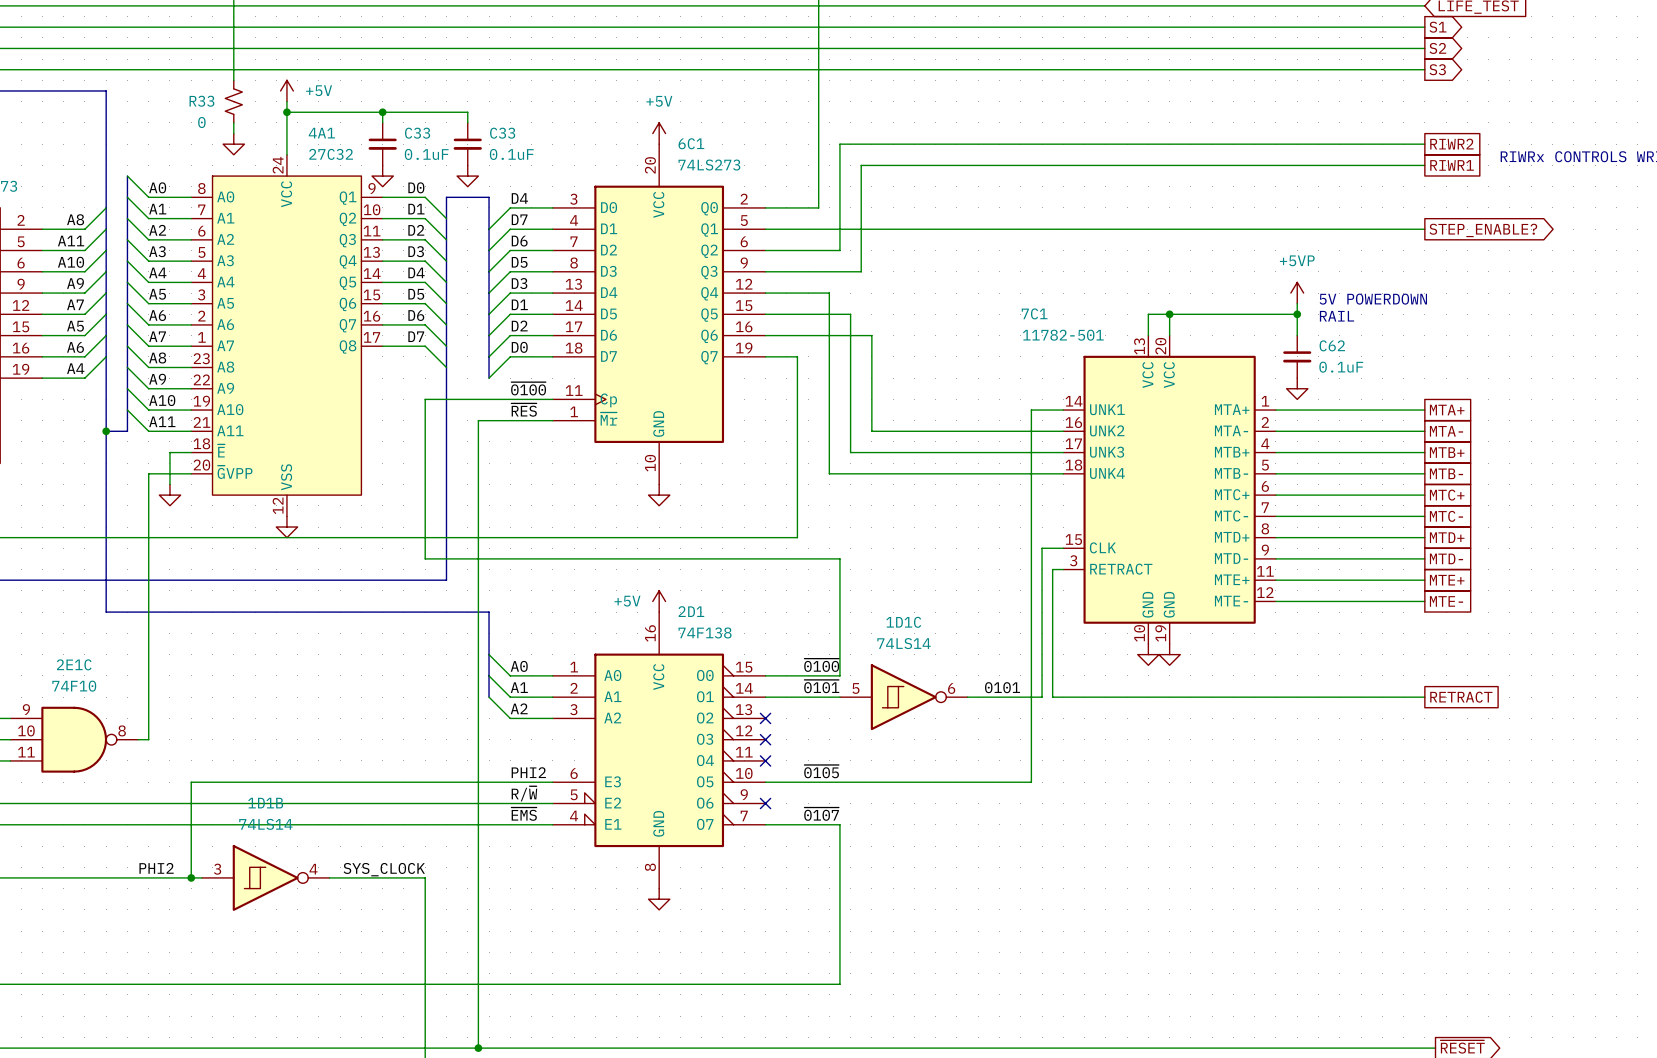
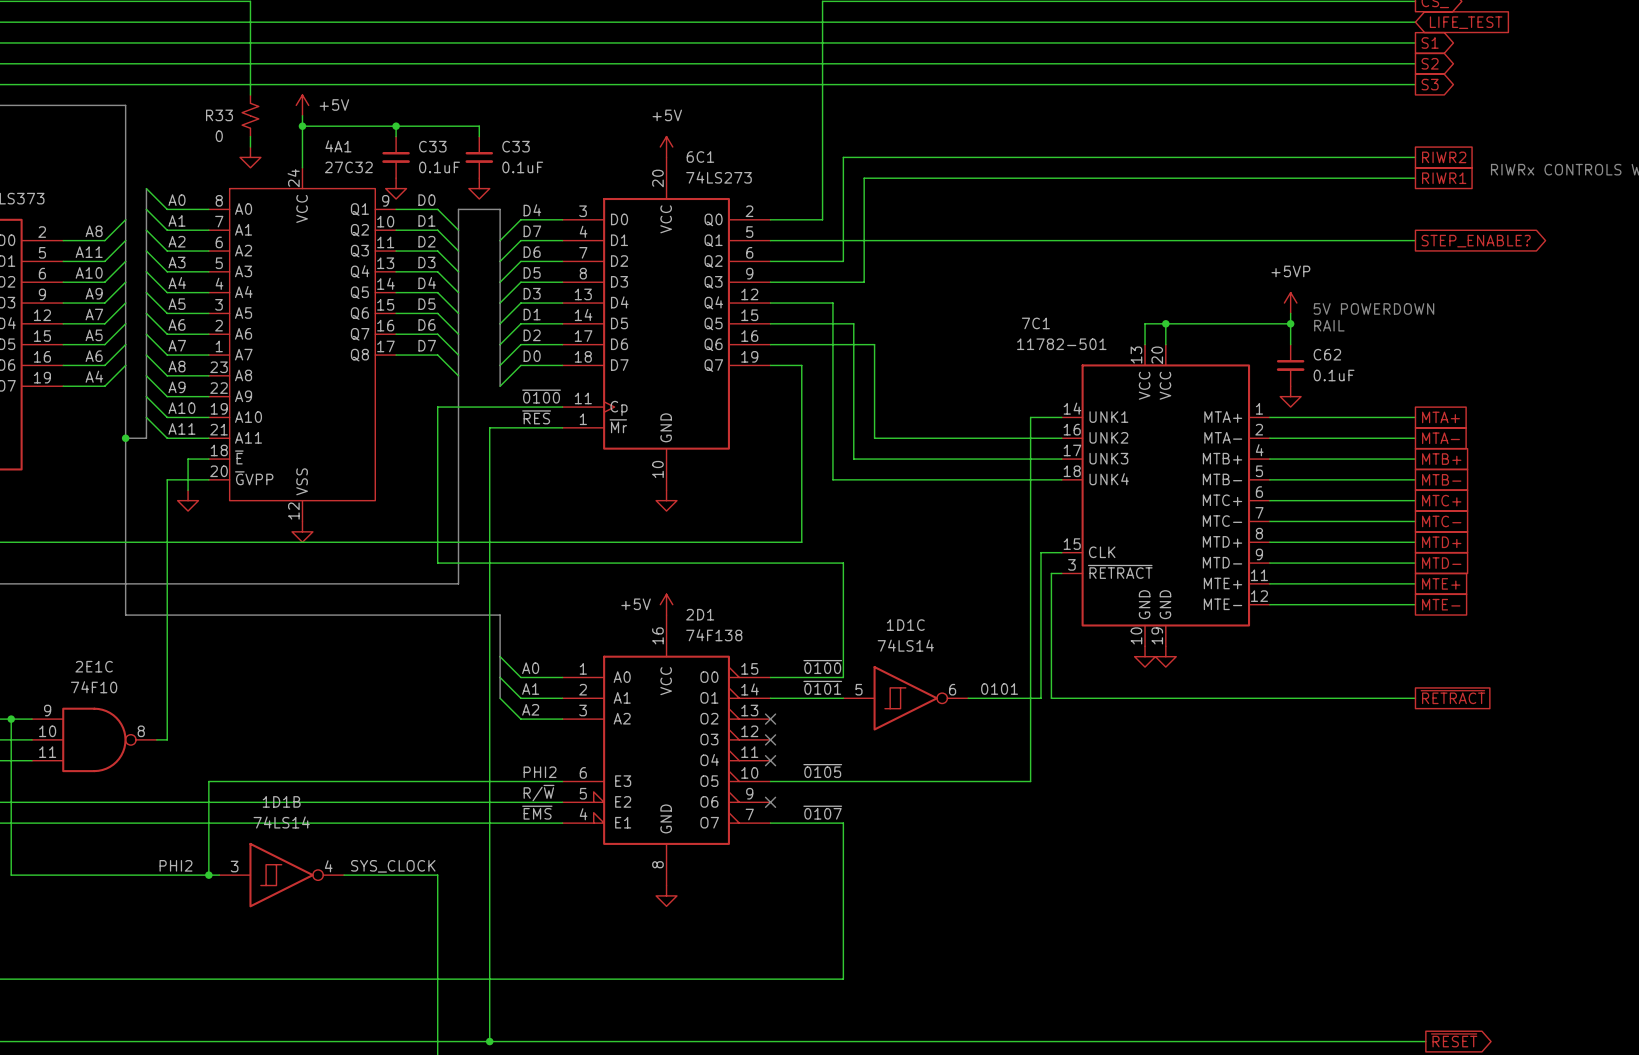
7C1 pin name: RETRACT (1121, 569) -> ~{RETRACT} (1120, 571)
global label: RETRACT (1461, 697) -> ~{RETRACT} (1452, 697)

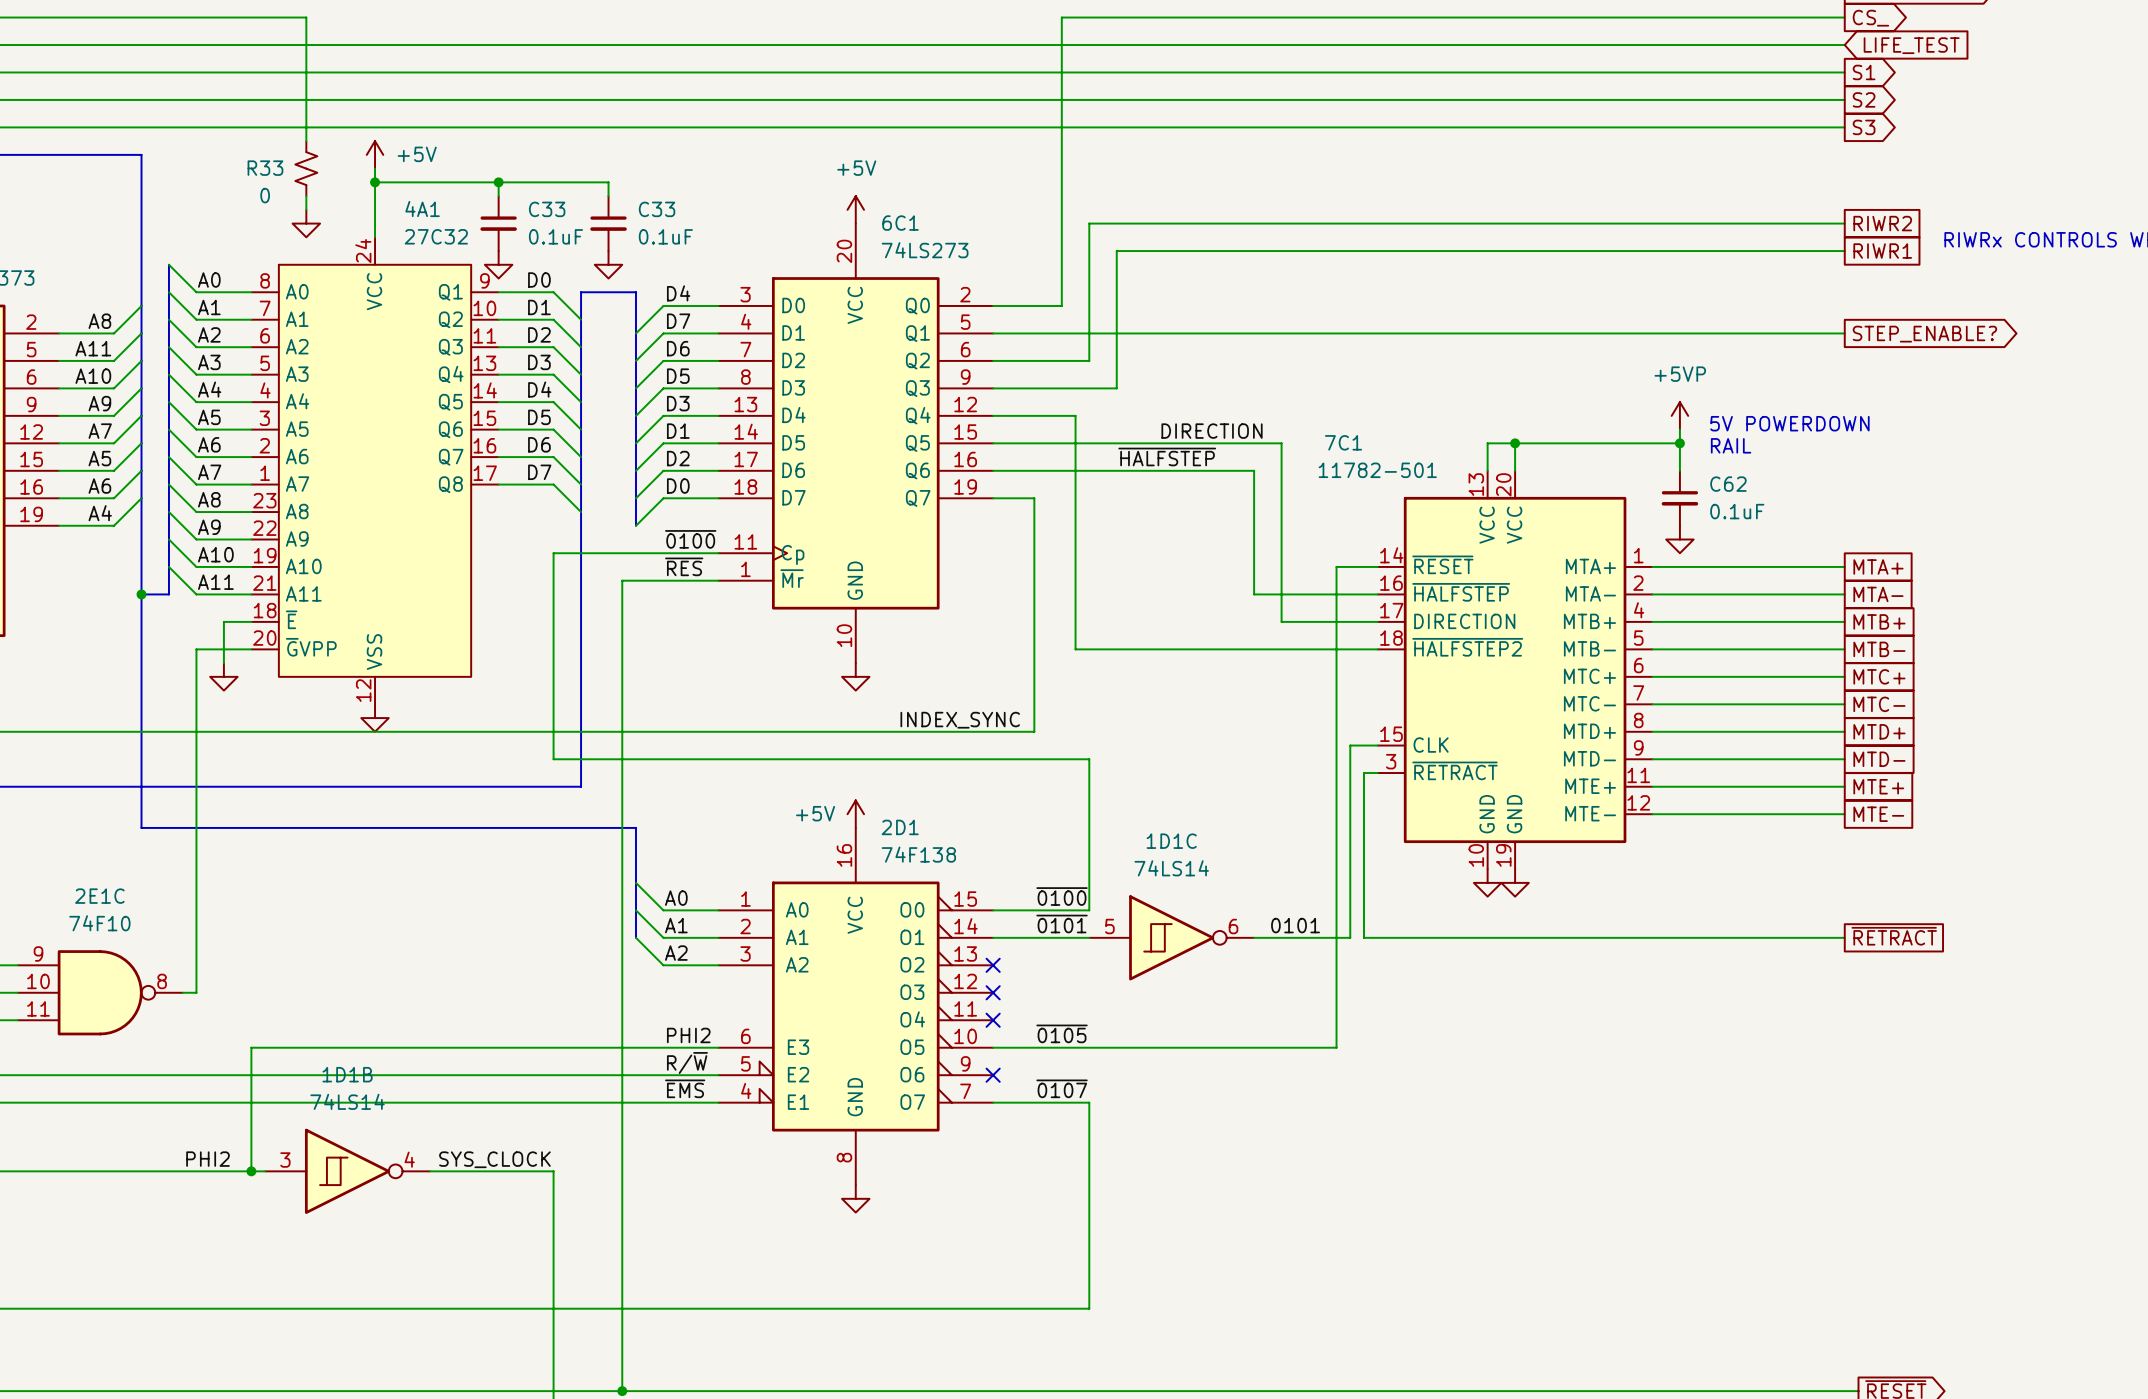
label: none -> DIRECTION (1212, 431)
wire: (853, 323) (853, 459) (988, 459) -> (1103, 443) (1281, 443) (1281, 621)
label: none -> ~{HALFSTEP} (1167, 456)
wire: (874, 344) (874, 438) (968, 438) -> (1130, 470) (1254, 470) (1254, 594)
7C1 pin name: UNK1 (1108, 417) -> ~{RESET} (1442, 564)
7C1 pin name: UNK2 (1108, 437) -> ~{HALFSTEP} (1461, 592)
7C1 pin name: UNK3 (1108, 458) -> DIRECTION (1464, 621)
7C1 pin name: UNK4 (1109, 479) -> ~{HALFSTEP2} (1467, 647)
label: none -> INDEX_SYNC (960, 720)

